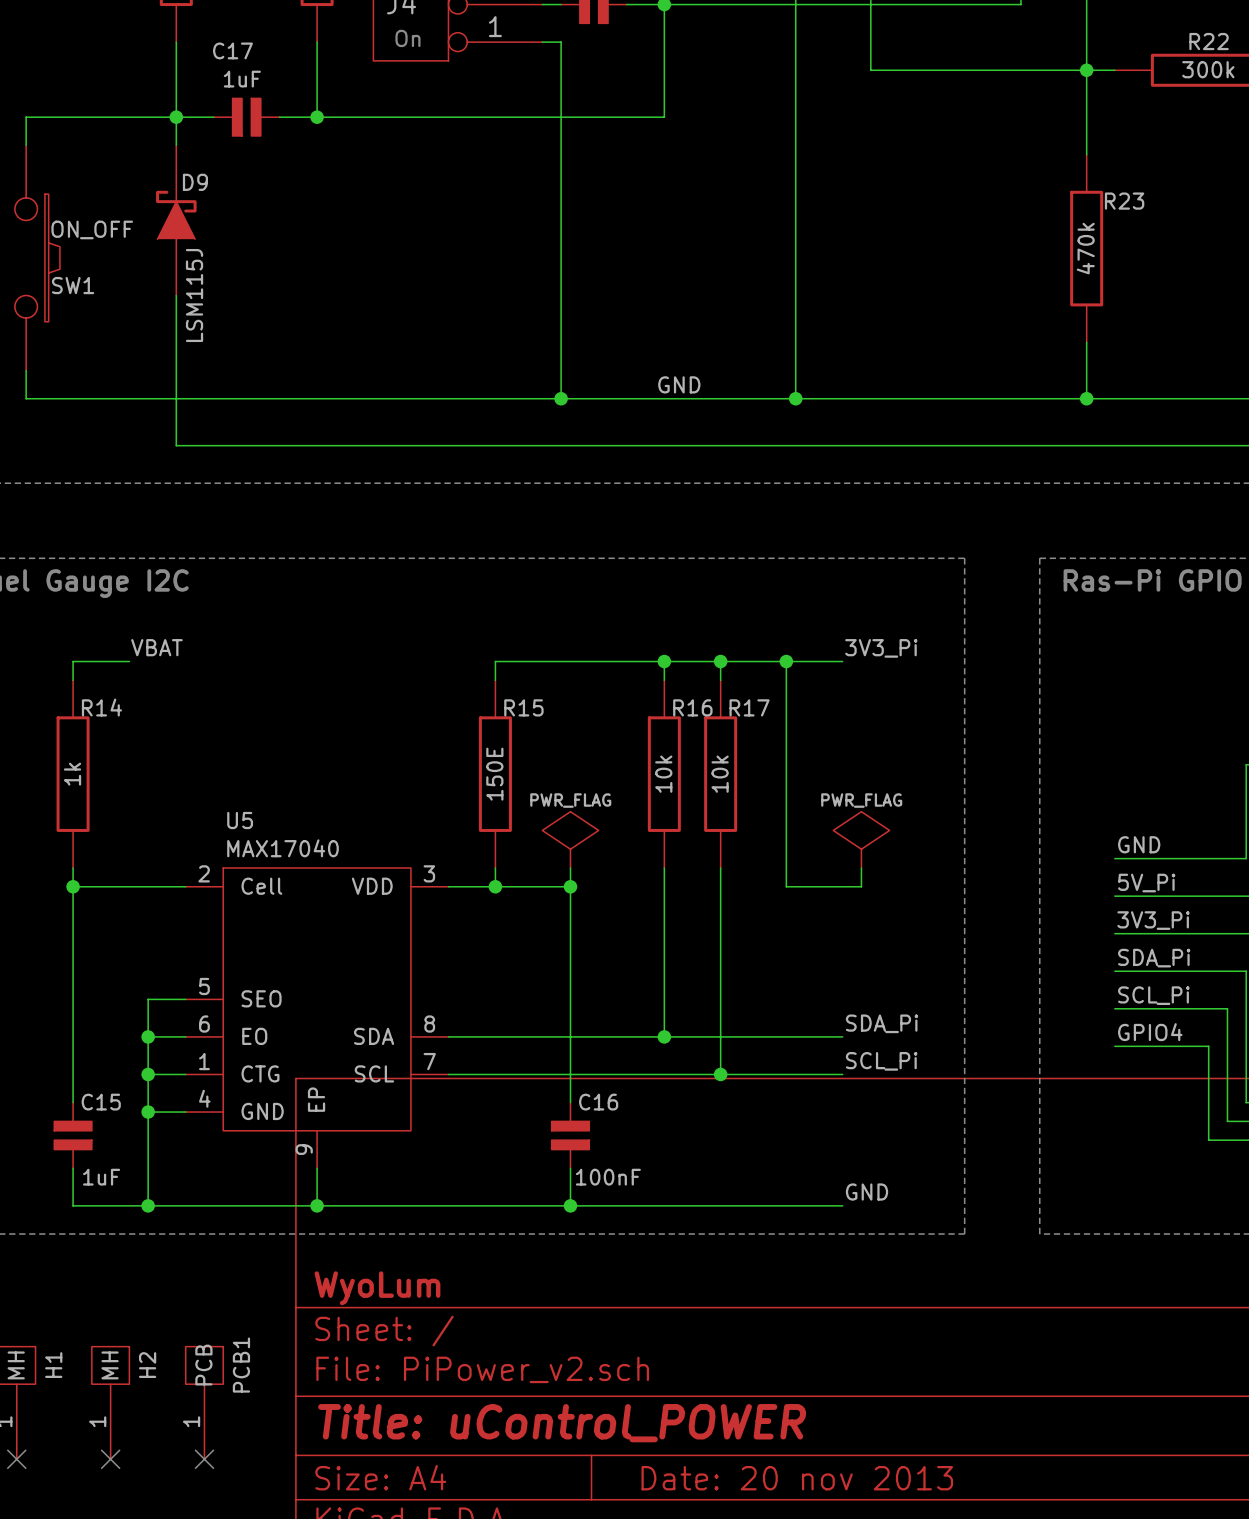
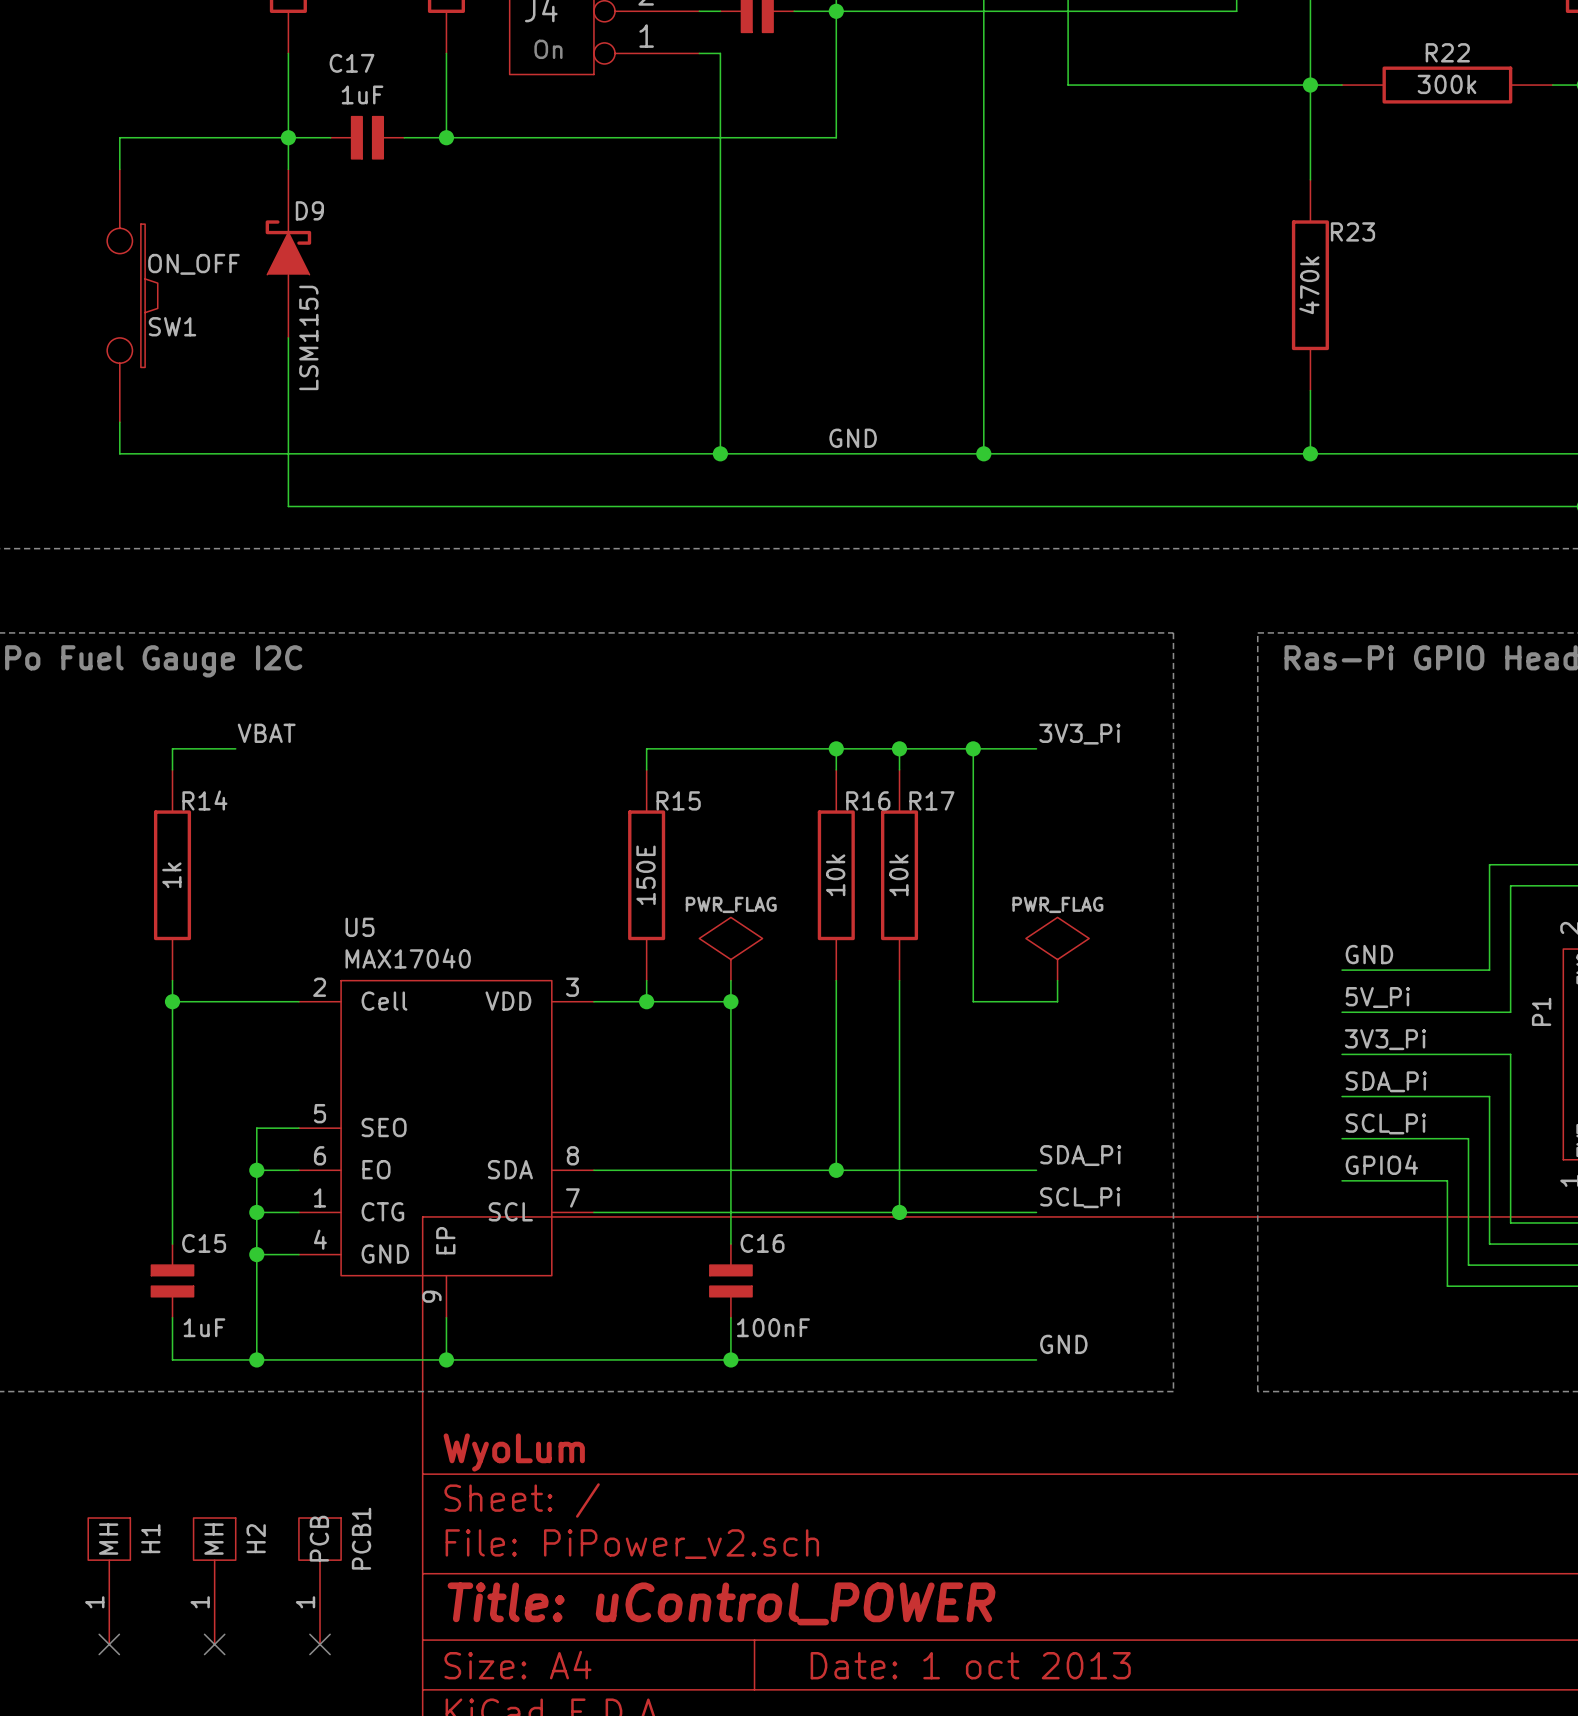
title block: Date: 20 nov 2013 (797, 1478) -> Date: 1 oct 2013 (970, 1665)

